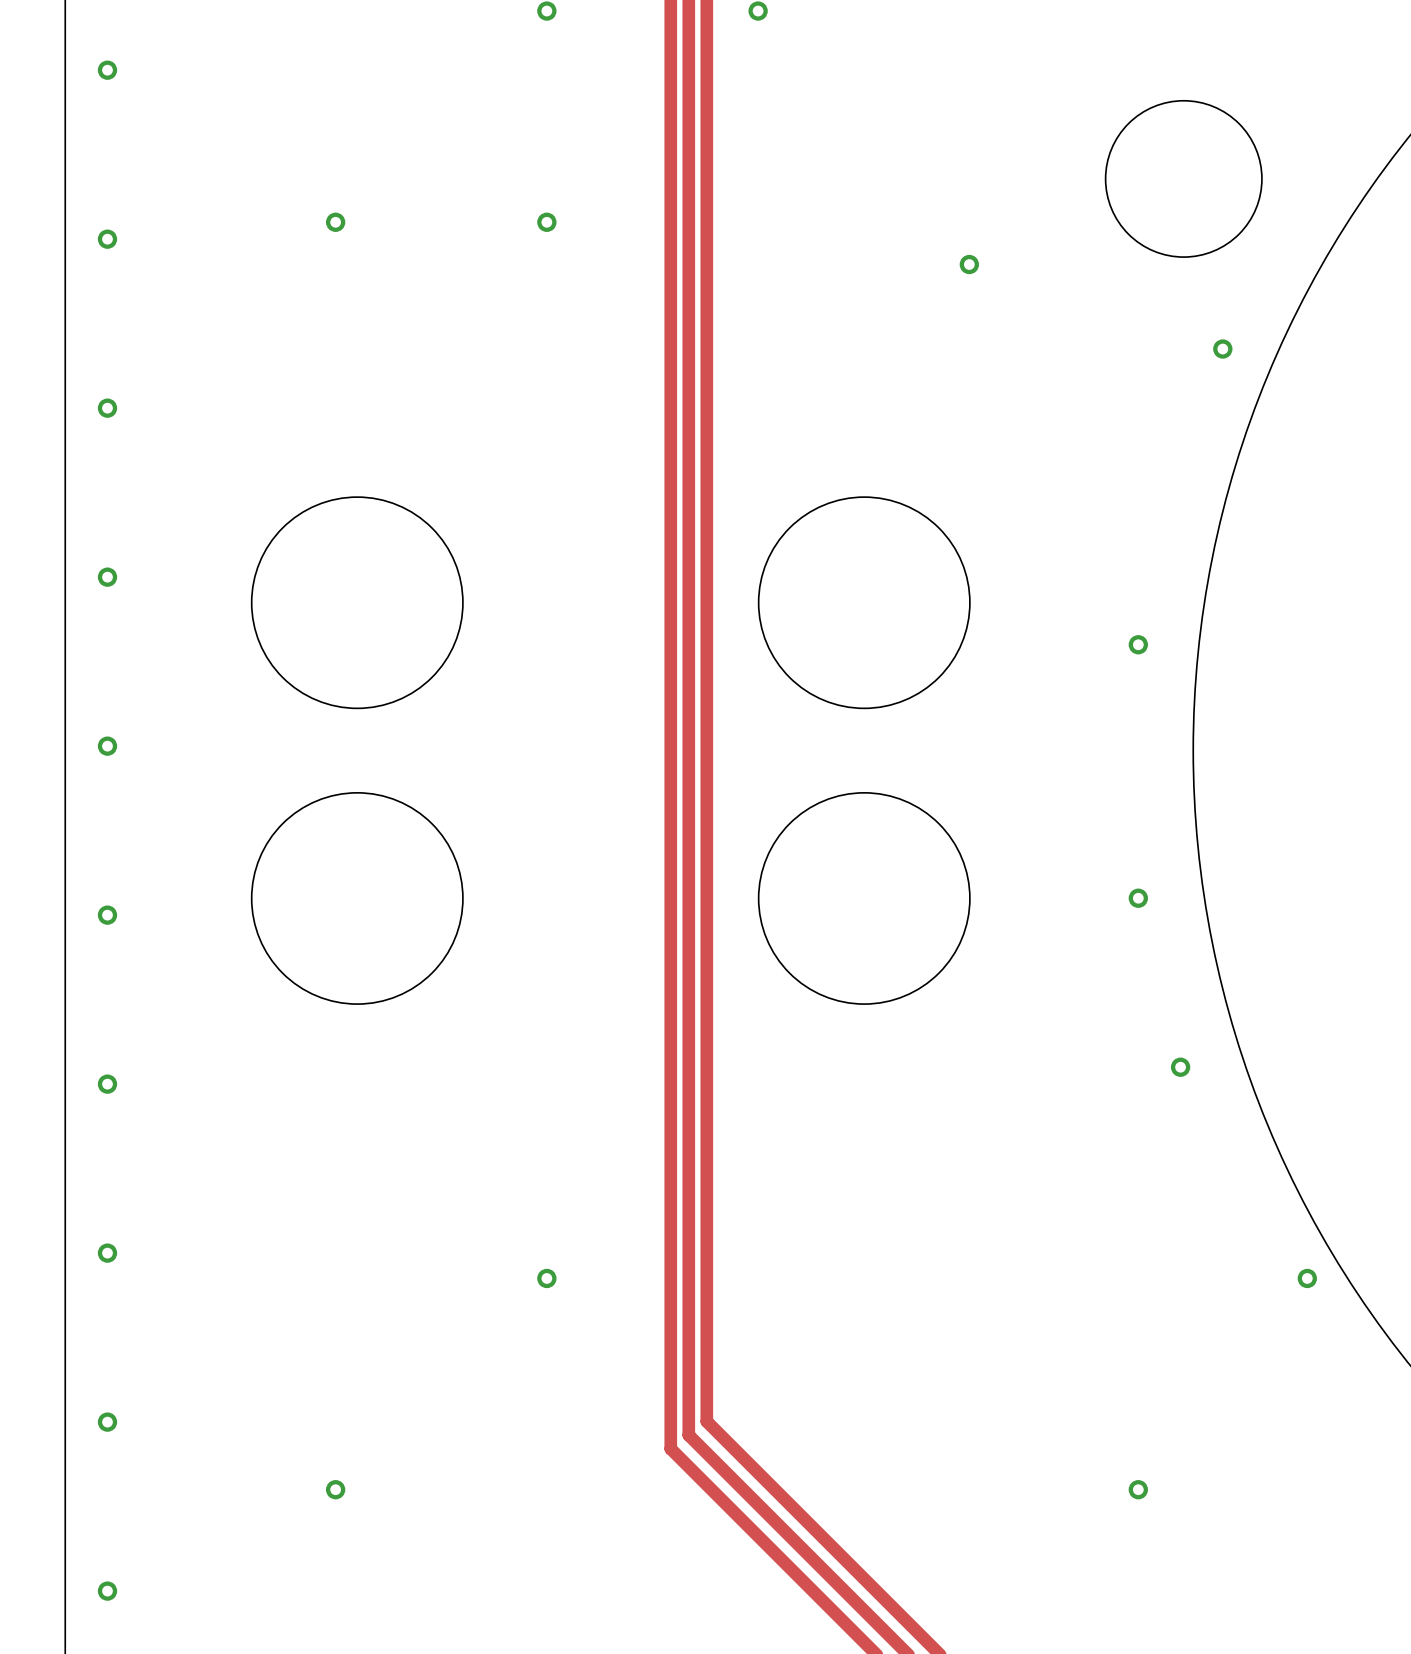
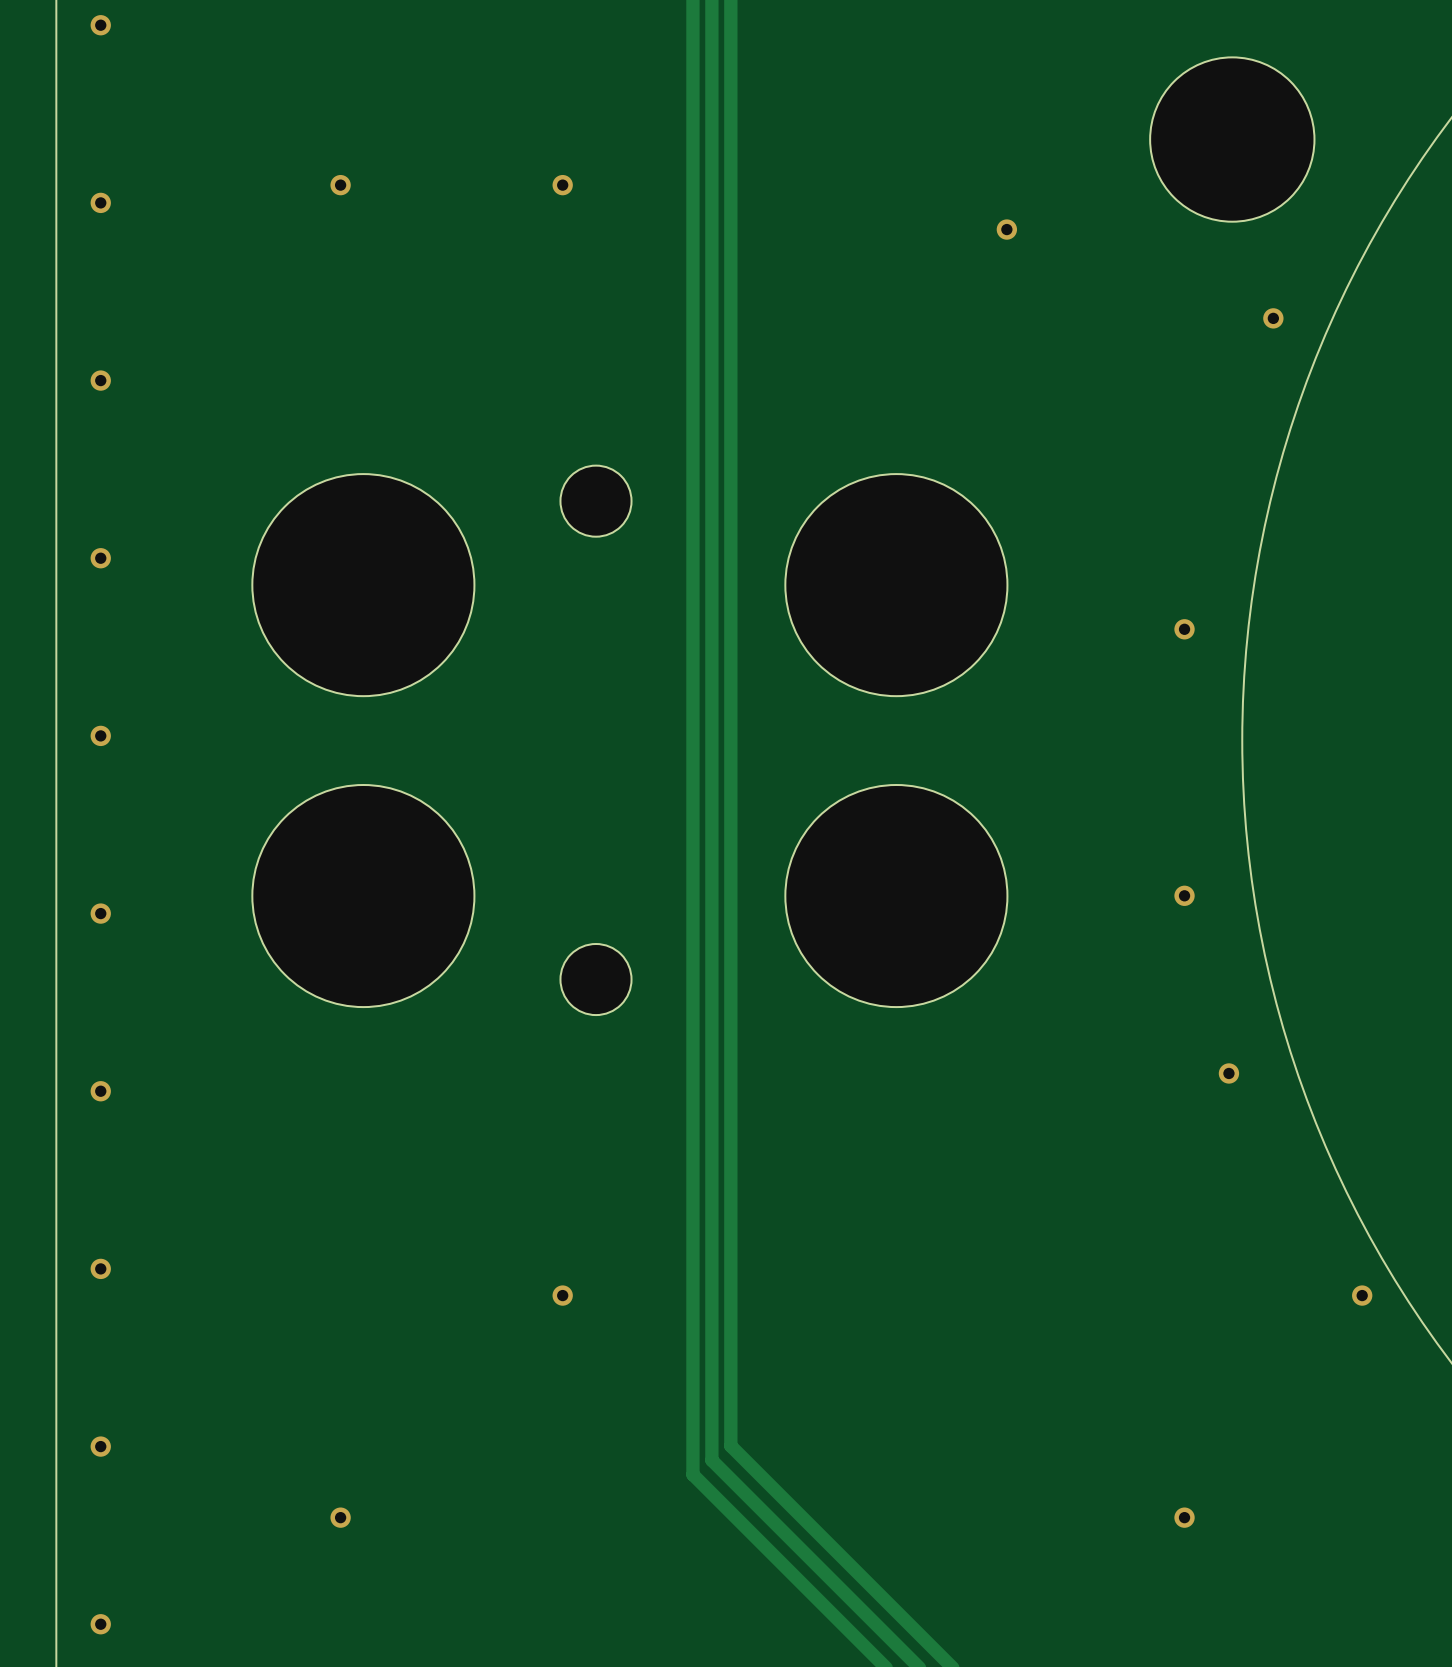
part: none -> (596, 501)
part: none -> (596, 979)

